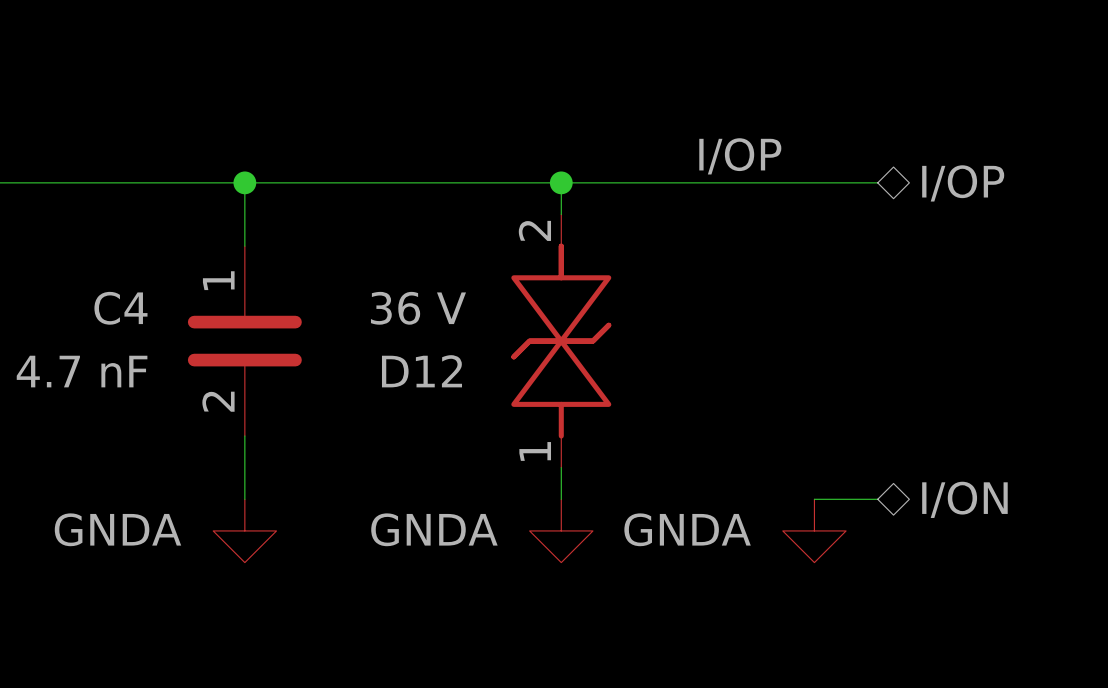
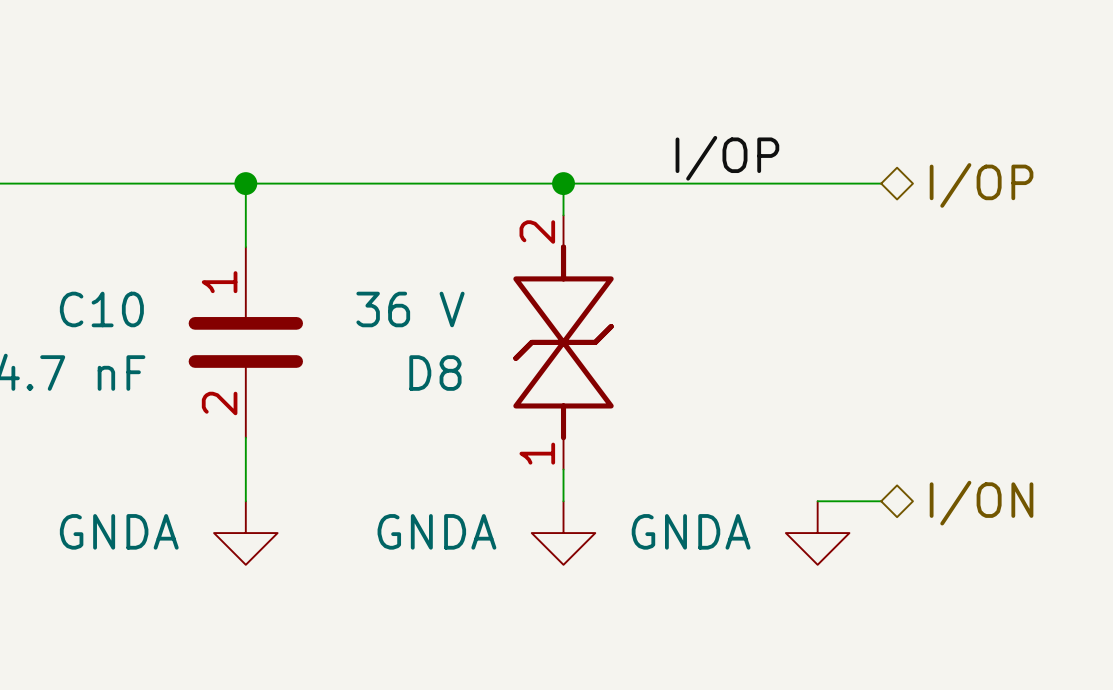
C4 name: C4 (120, 308) -> C10 (101, 309)
D12 name: D12 (421, 371) -> D8 (435, 373)

